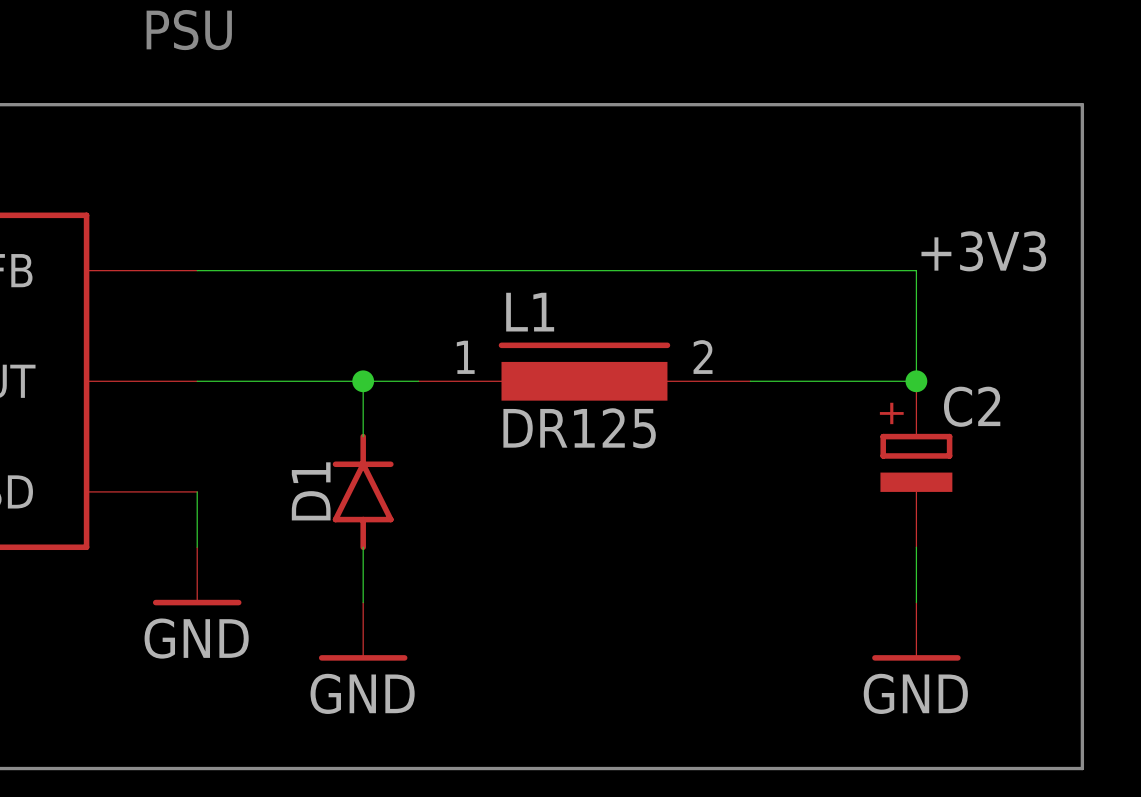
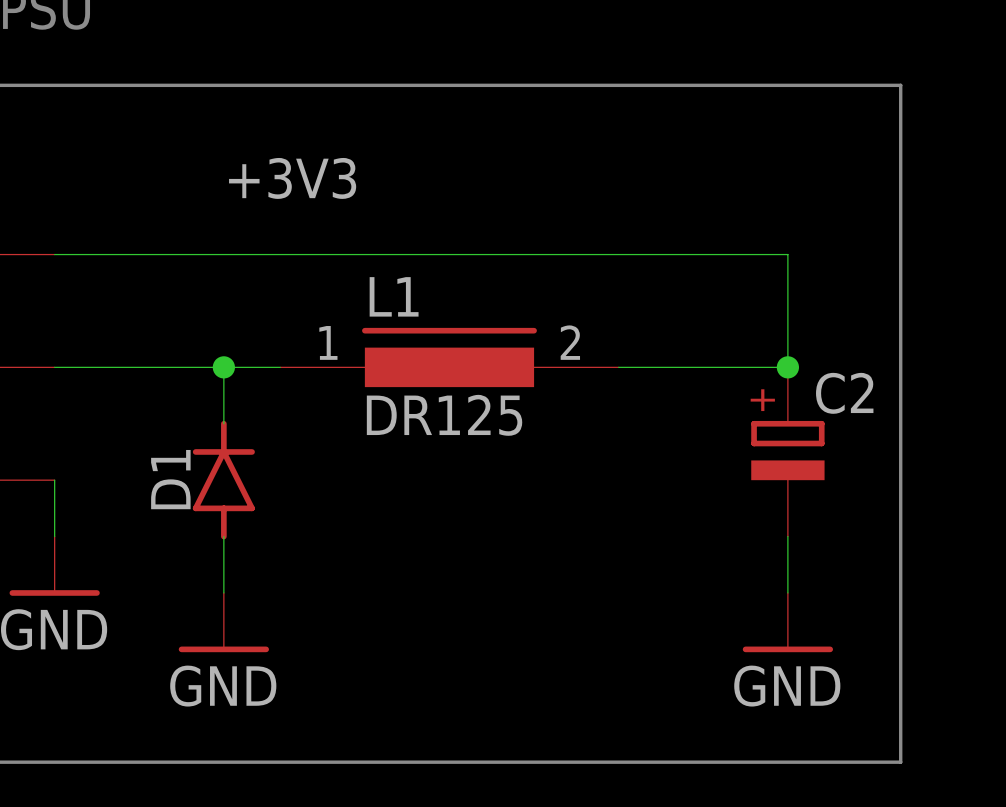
line: (1027, 104) (1082, 104) (1082, 768) (1027, 768) -> (900, 85) (900, 762)
label: none -> +3V3 (292, 178)
label: +3V3 (983, 251) -> none

